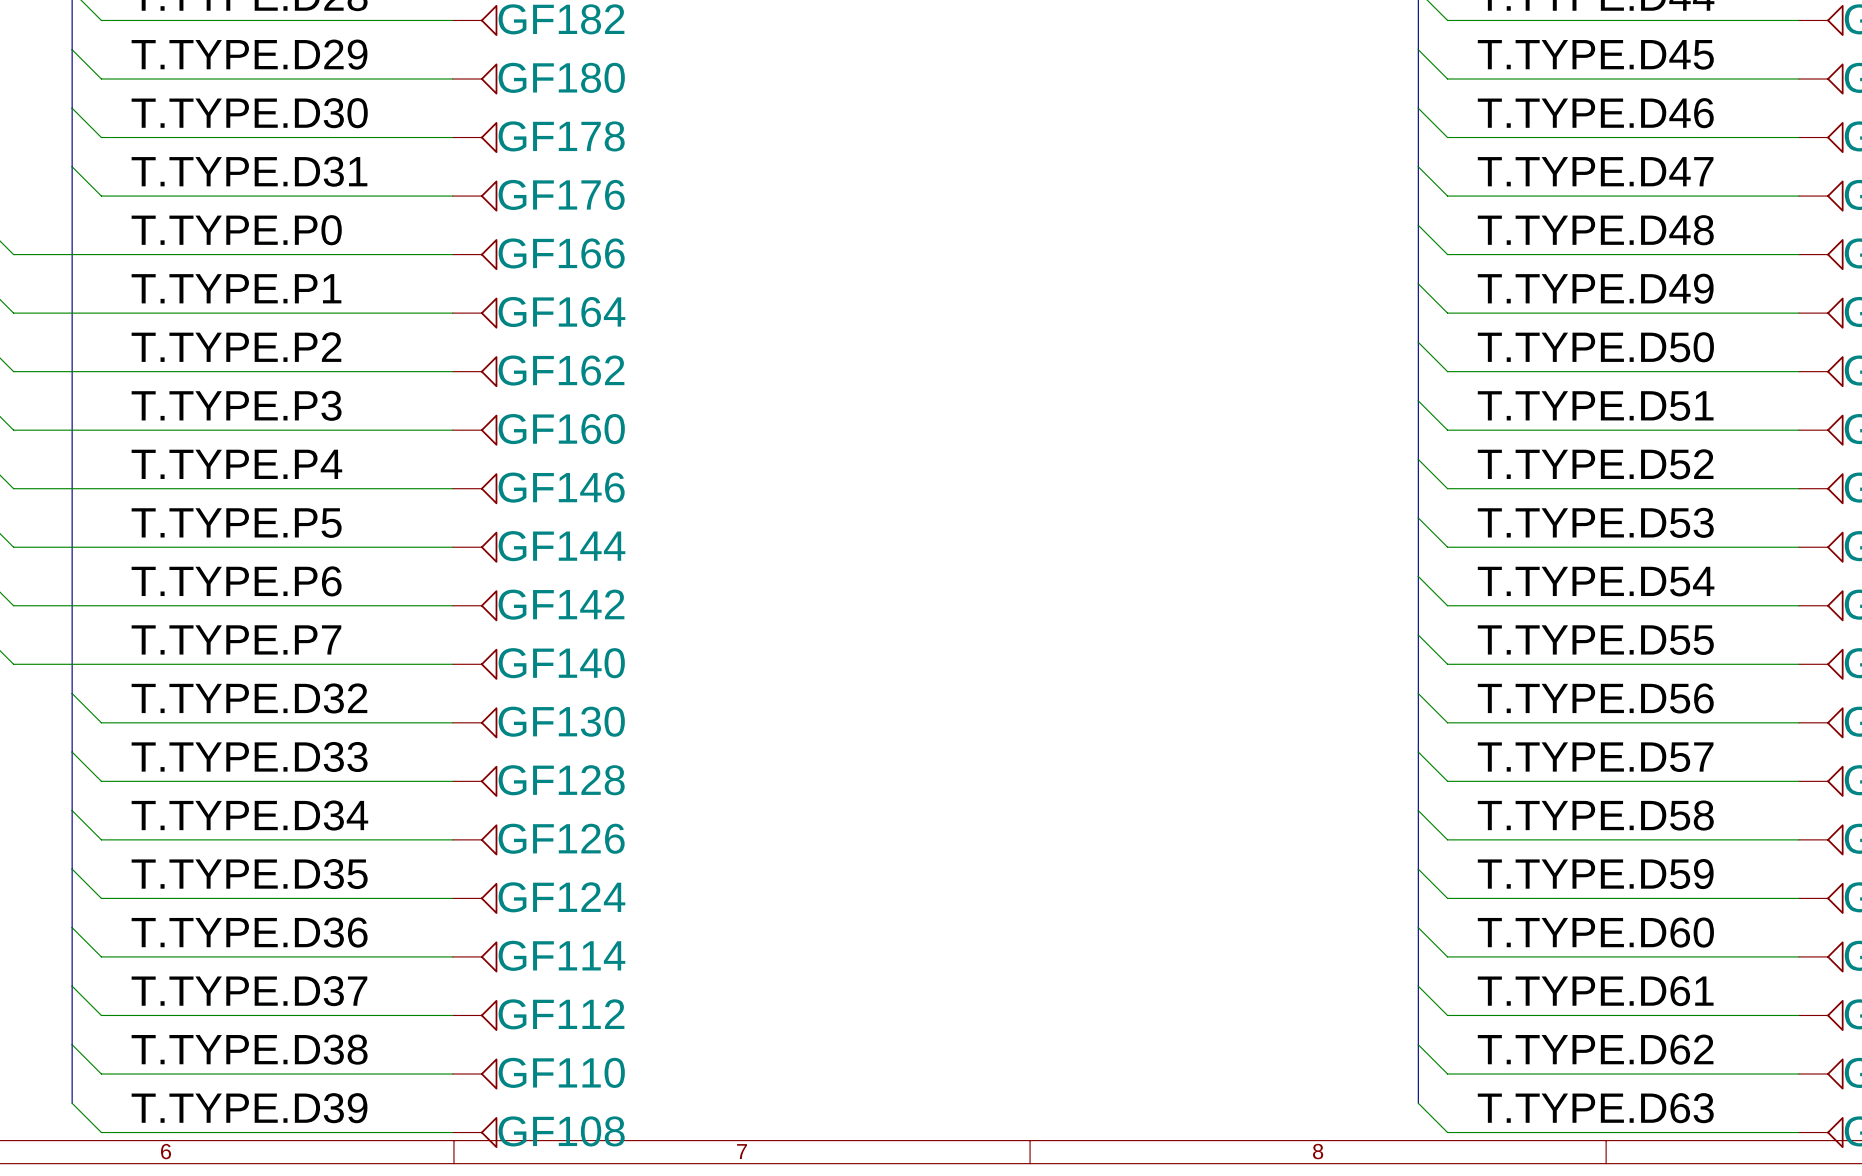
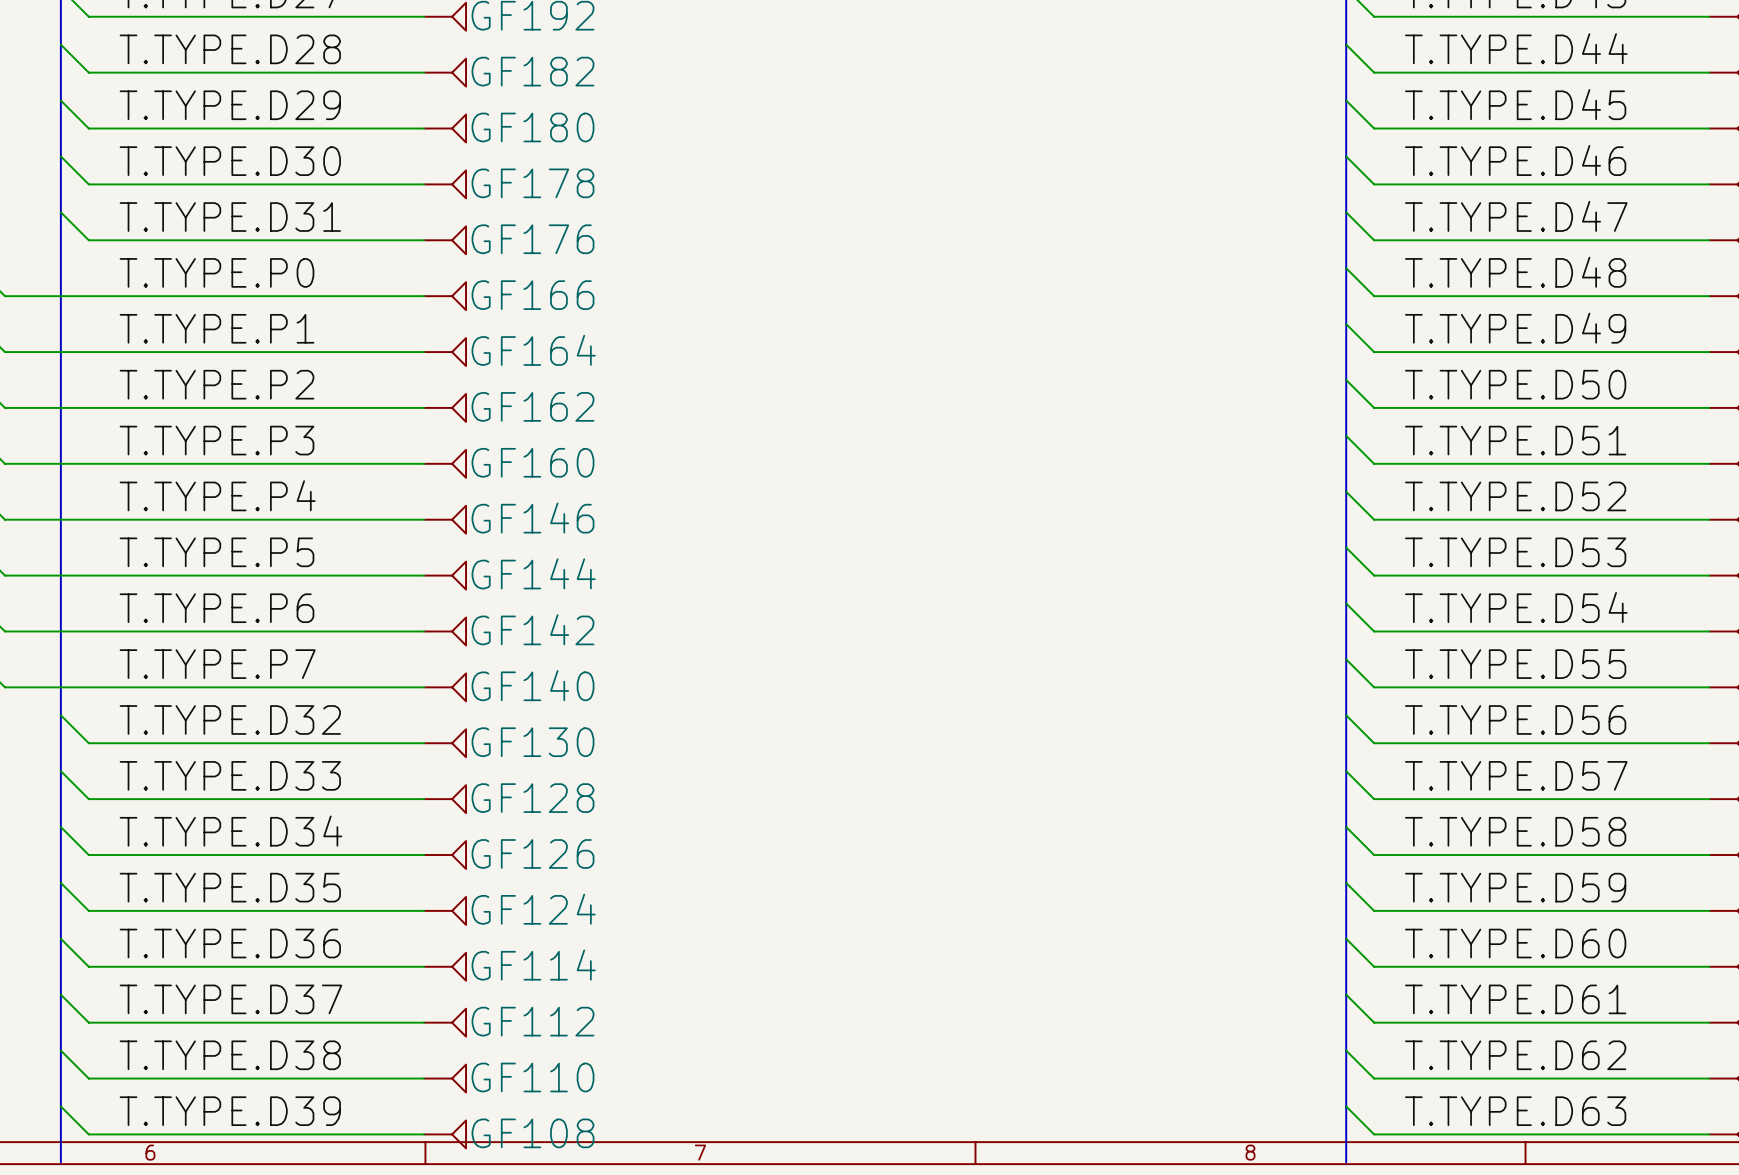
bus: none -> (60, 1106) (60, 1162)
bus: none -> (1346, 1106) (1346, 1162)

